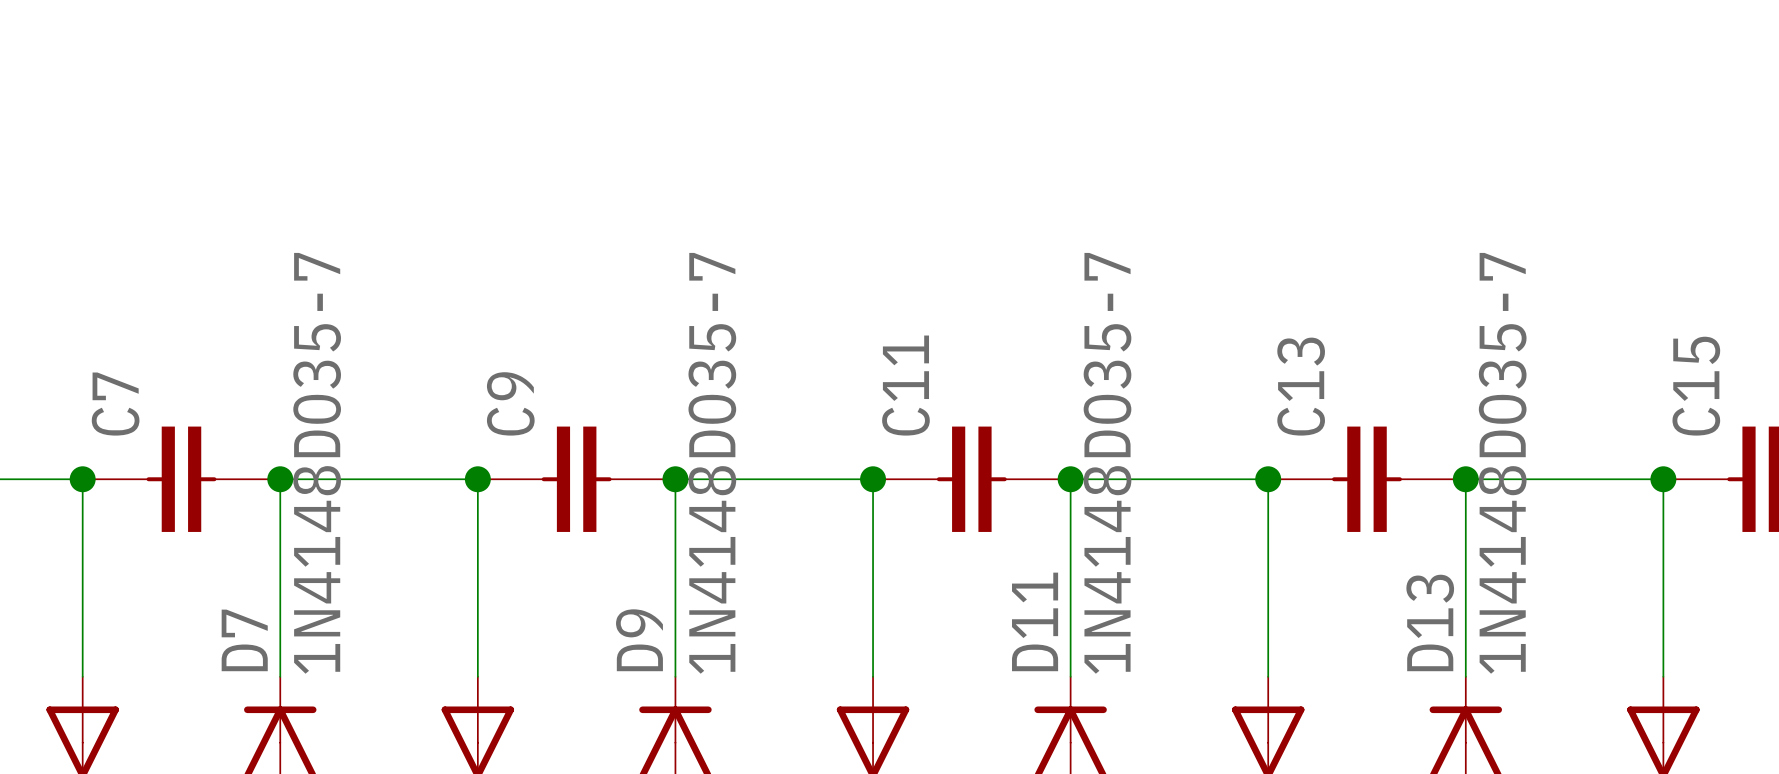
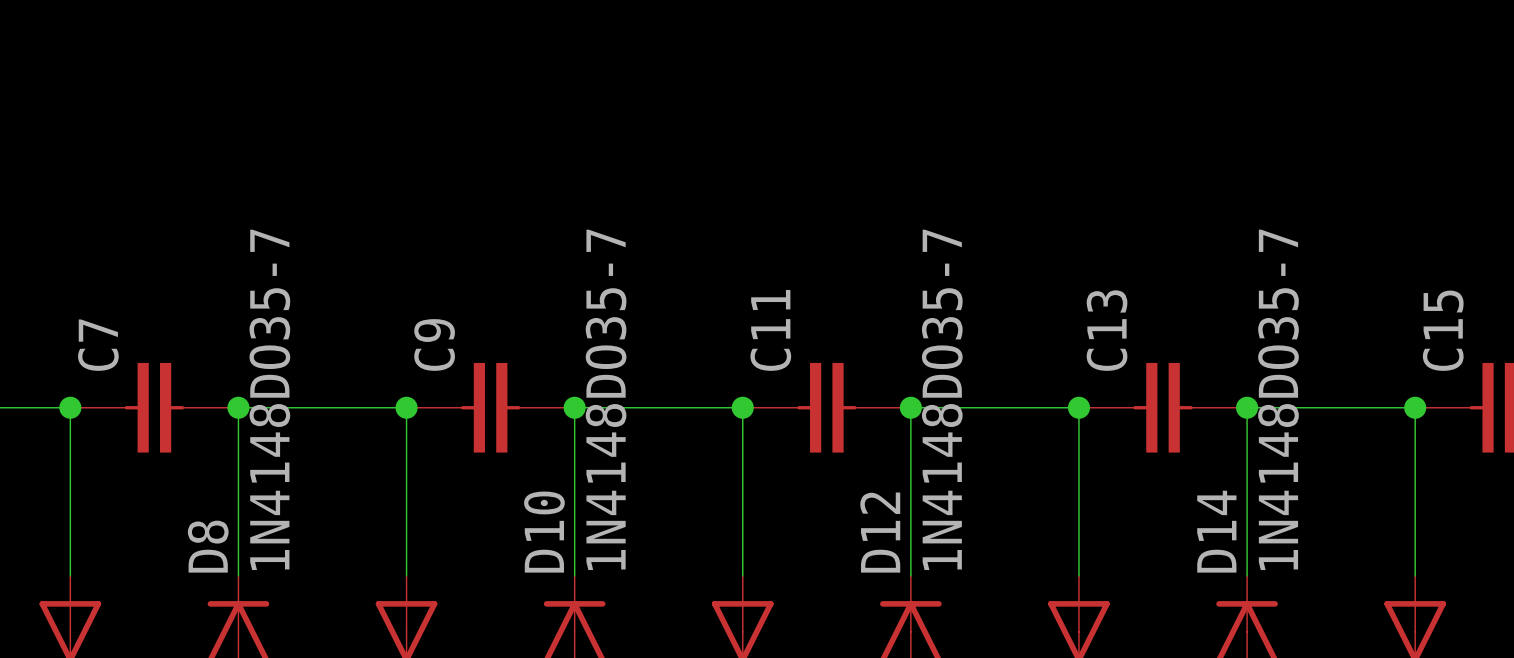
D11 name: D11 (1035, 621) -> D12 (880, 532)
D13 name: D13 (1430, 622) -> D14 (1216, 531)
D7 name: D7 (244, 640) -> D8 (208, 546)
D9 name: D9 (639, 640) -> D10 (544, 532)

